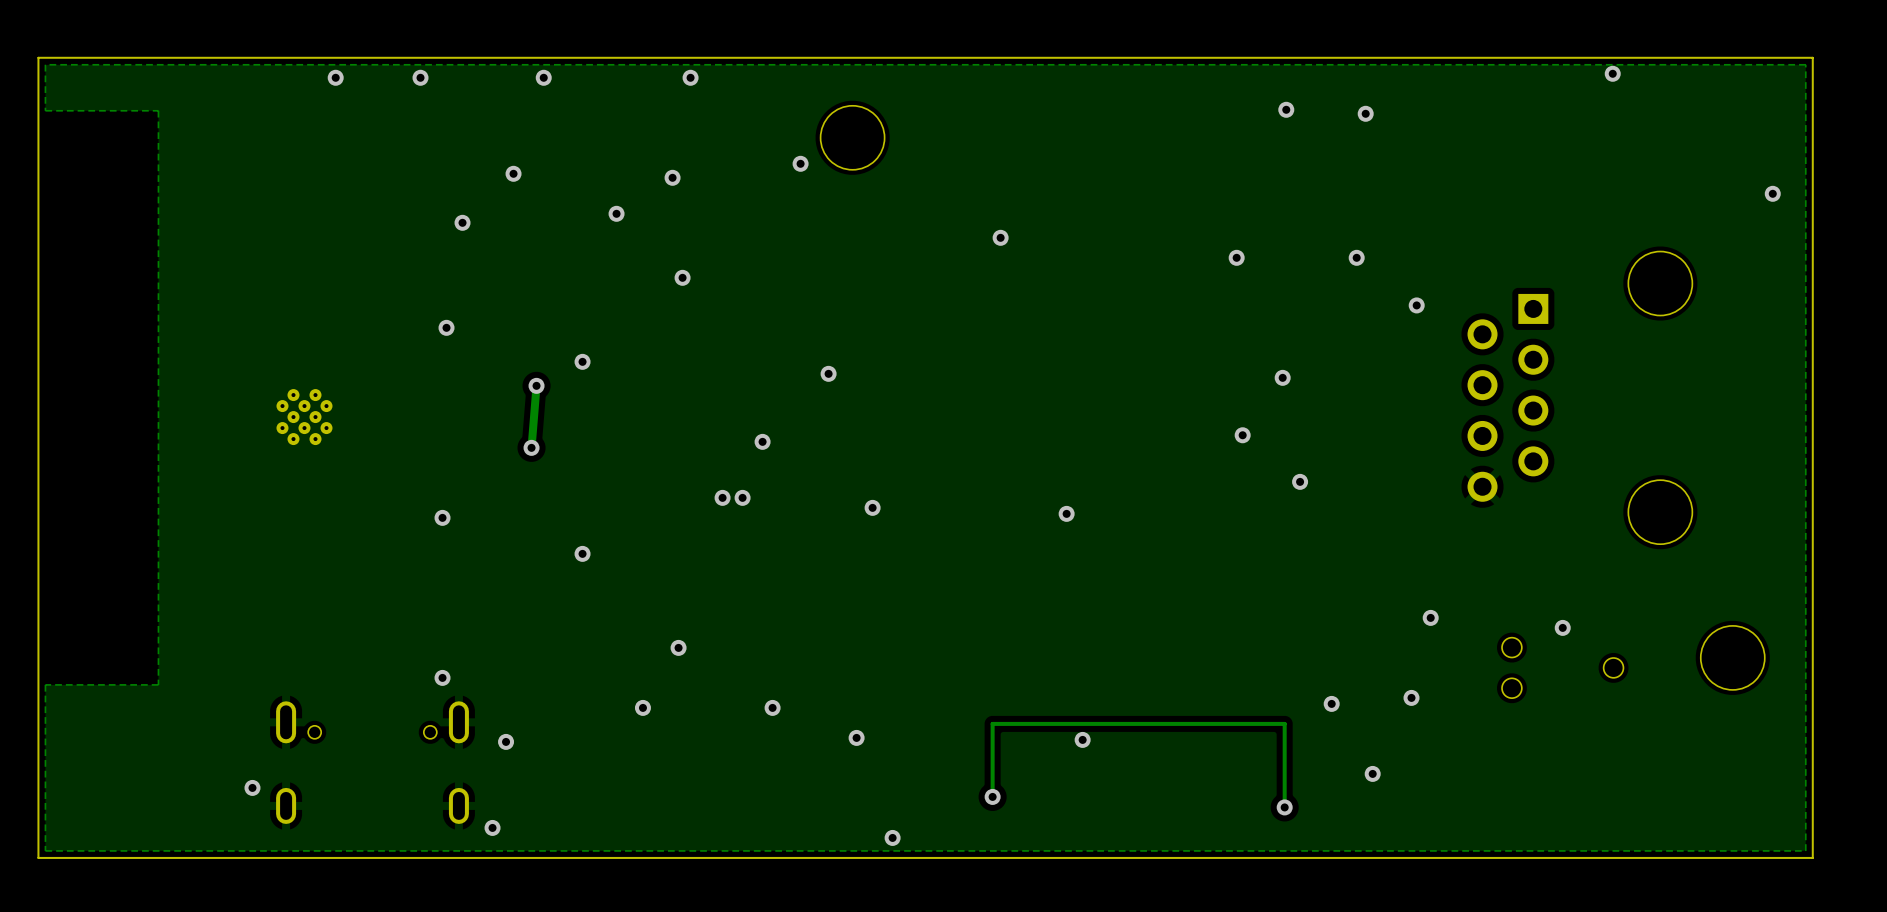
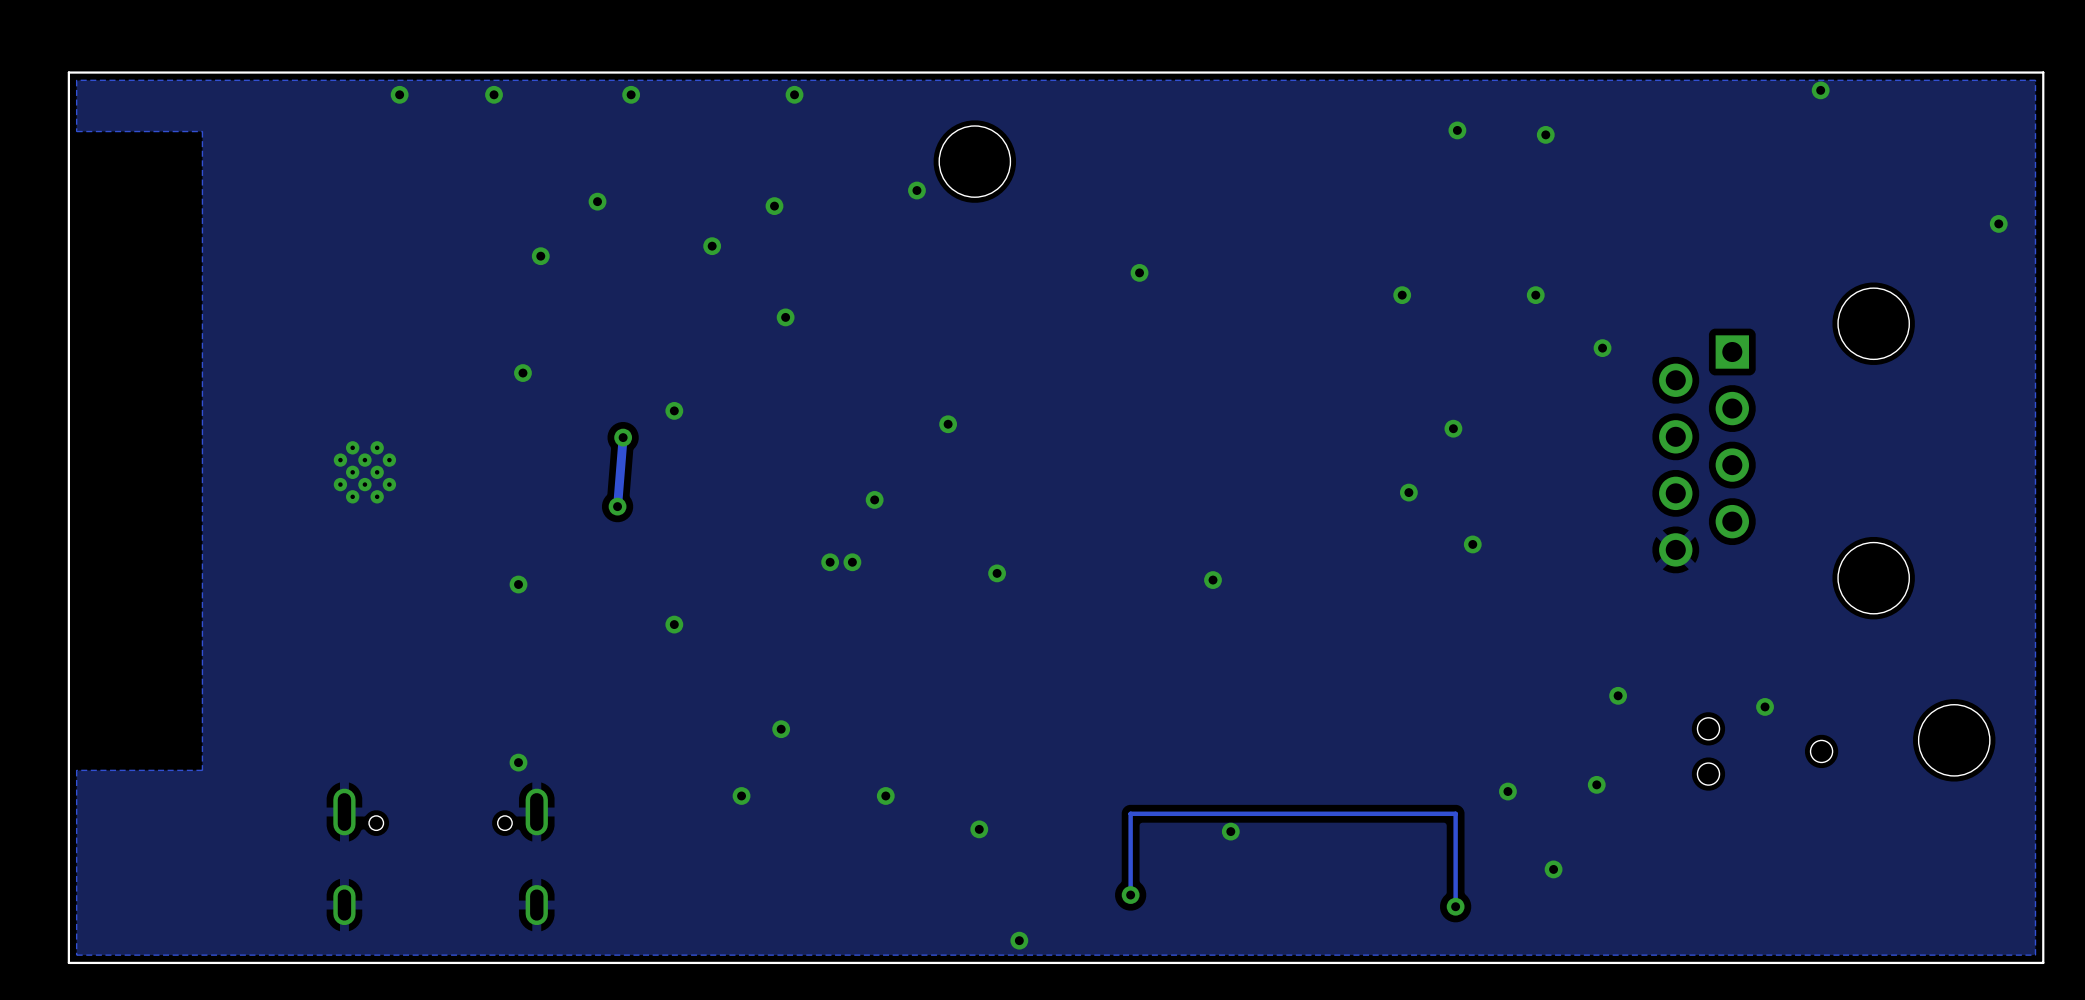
via: (506, 741) -> none
via: (252, 787) -> none
via: (492, 827) -> none

